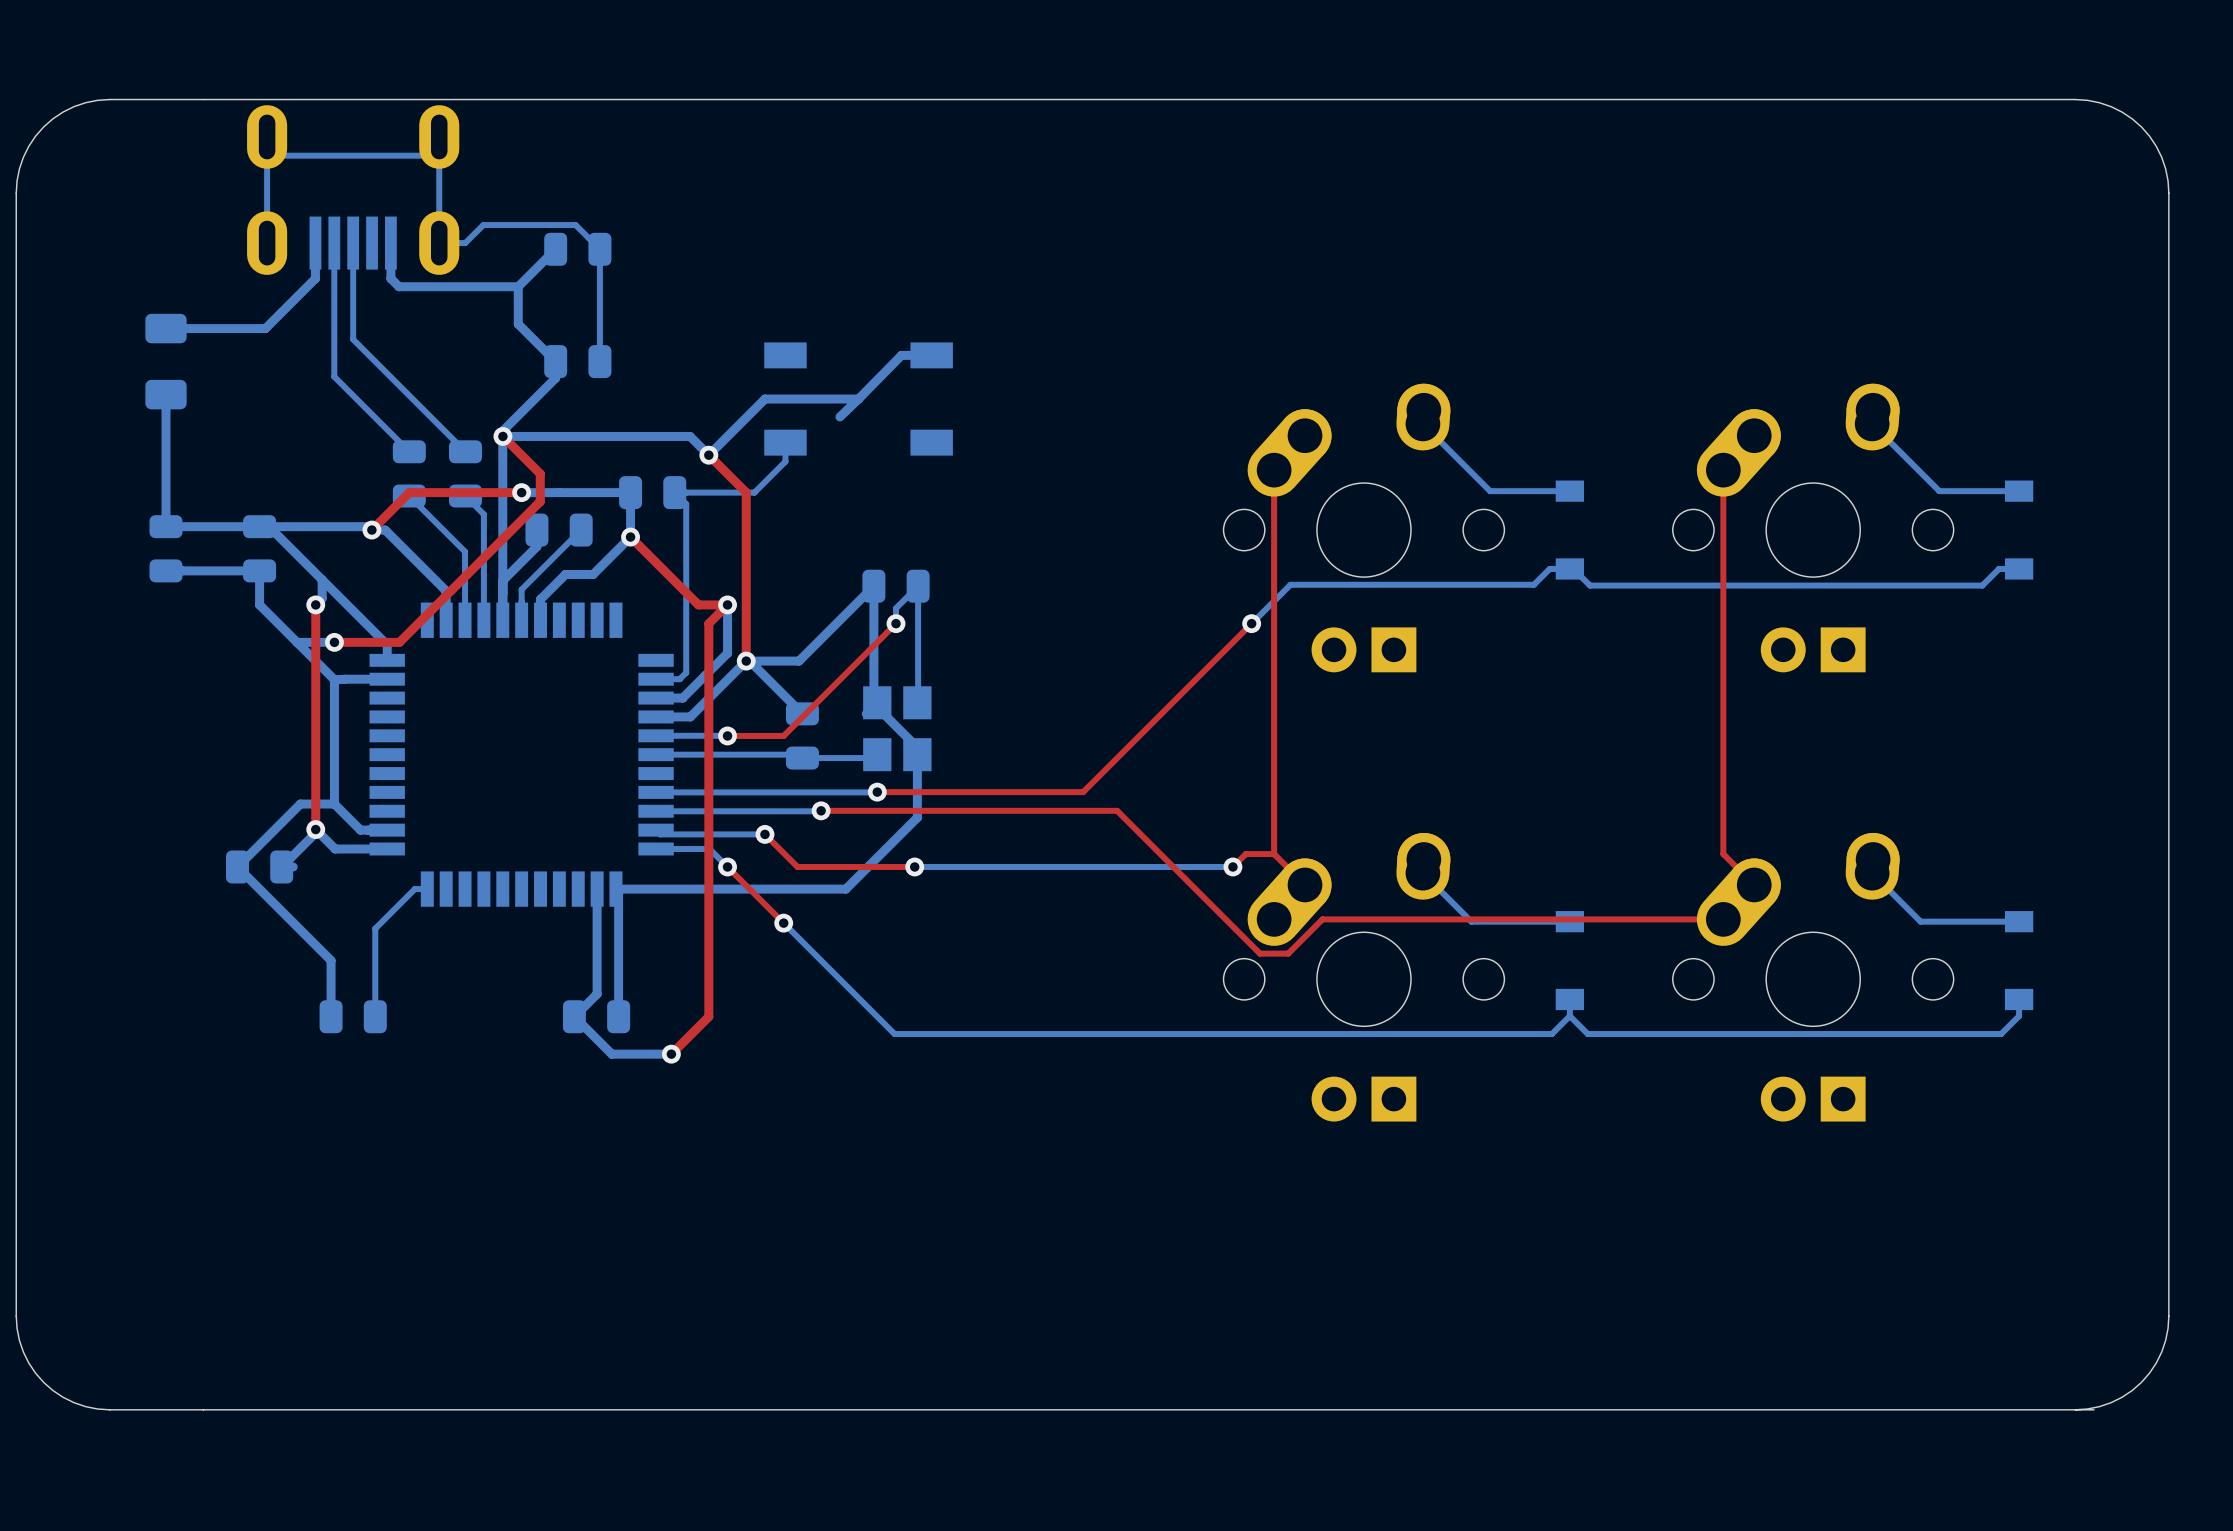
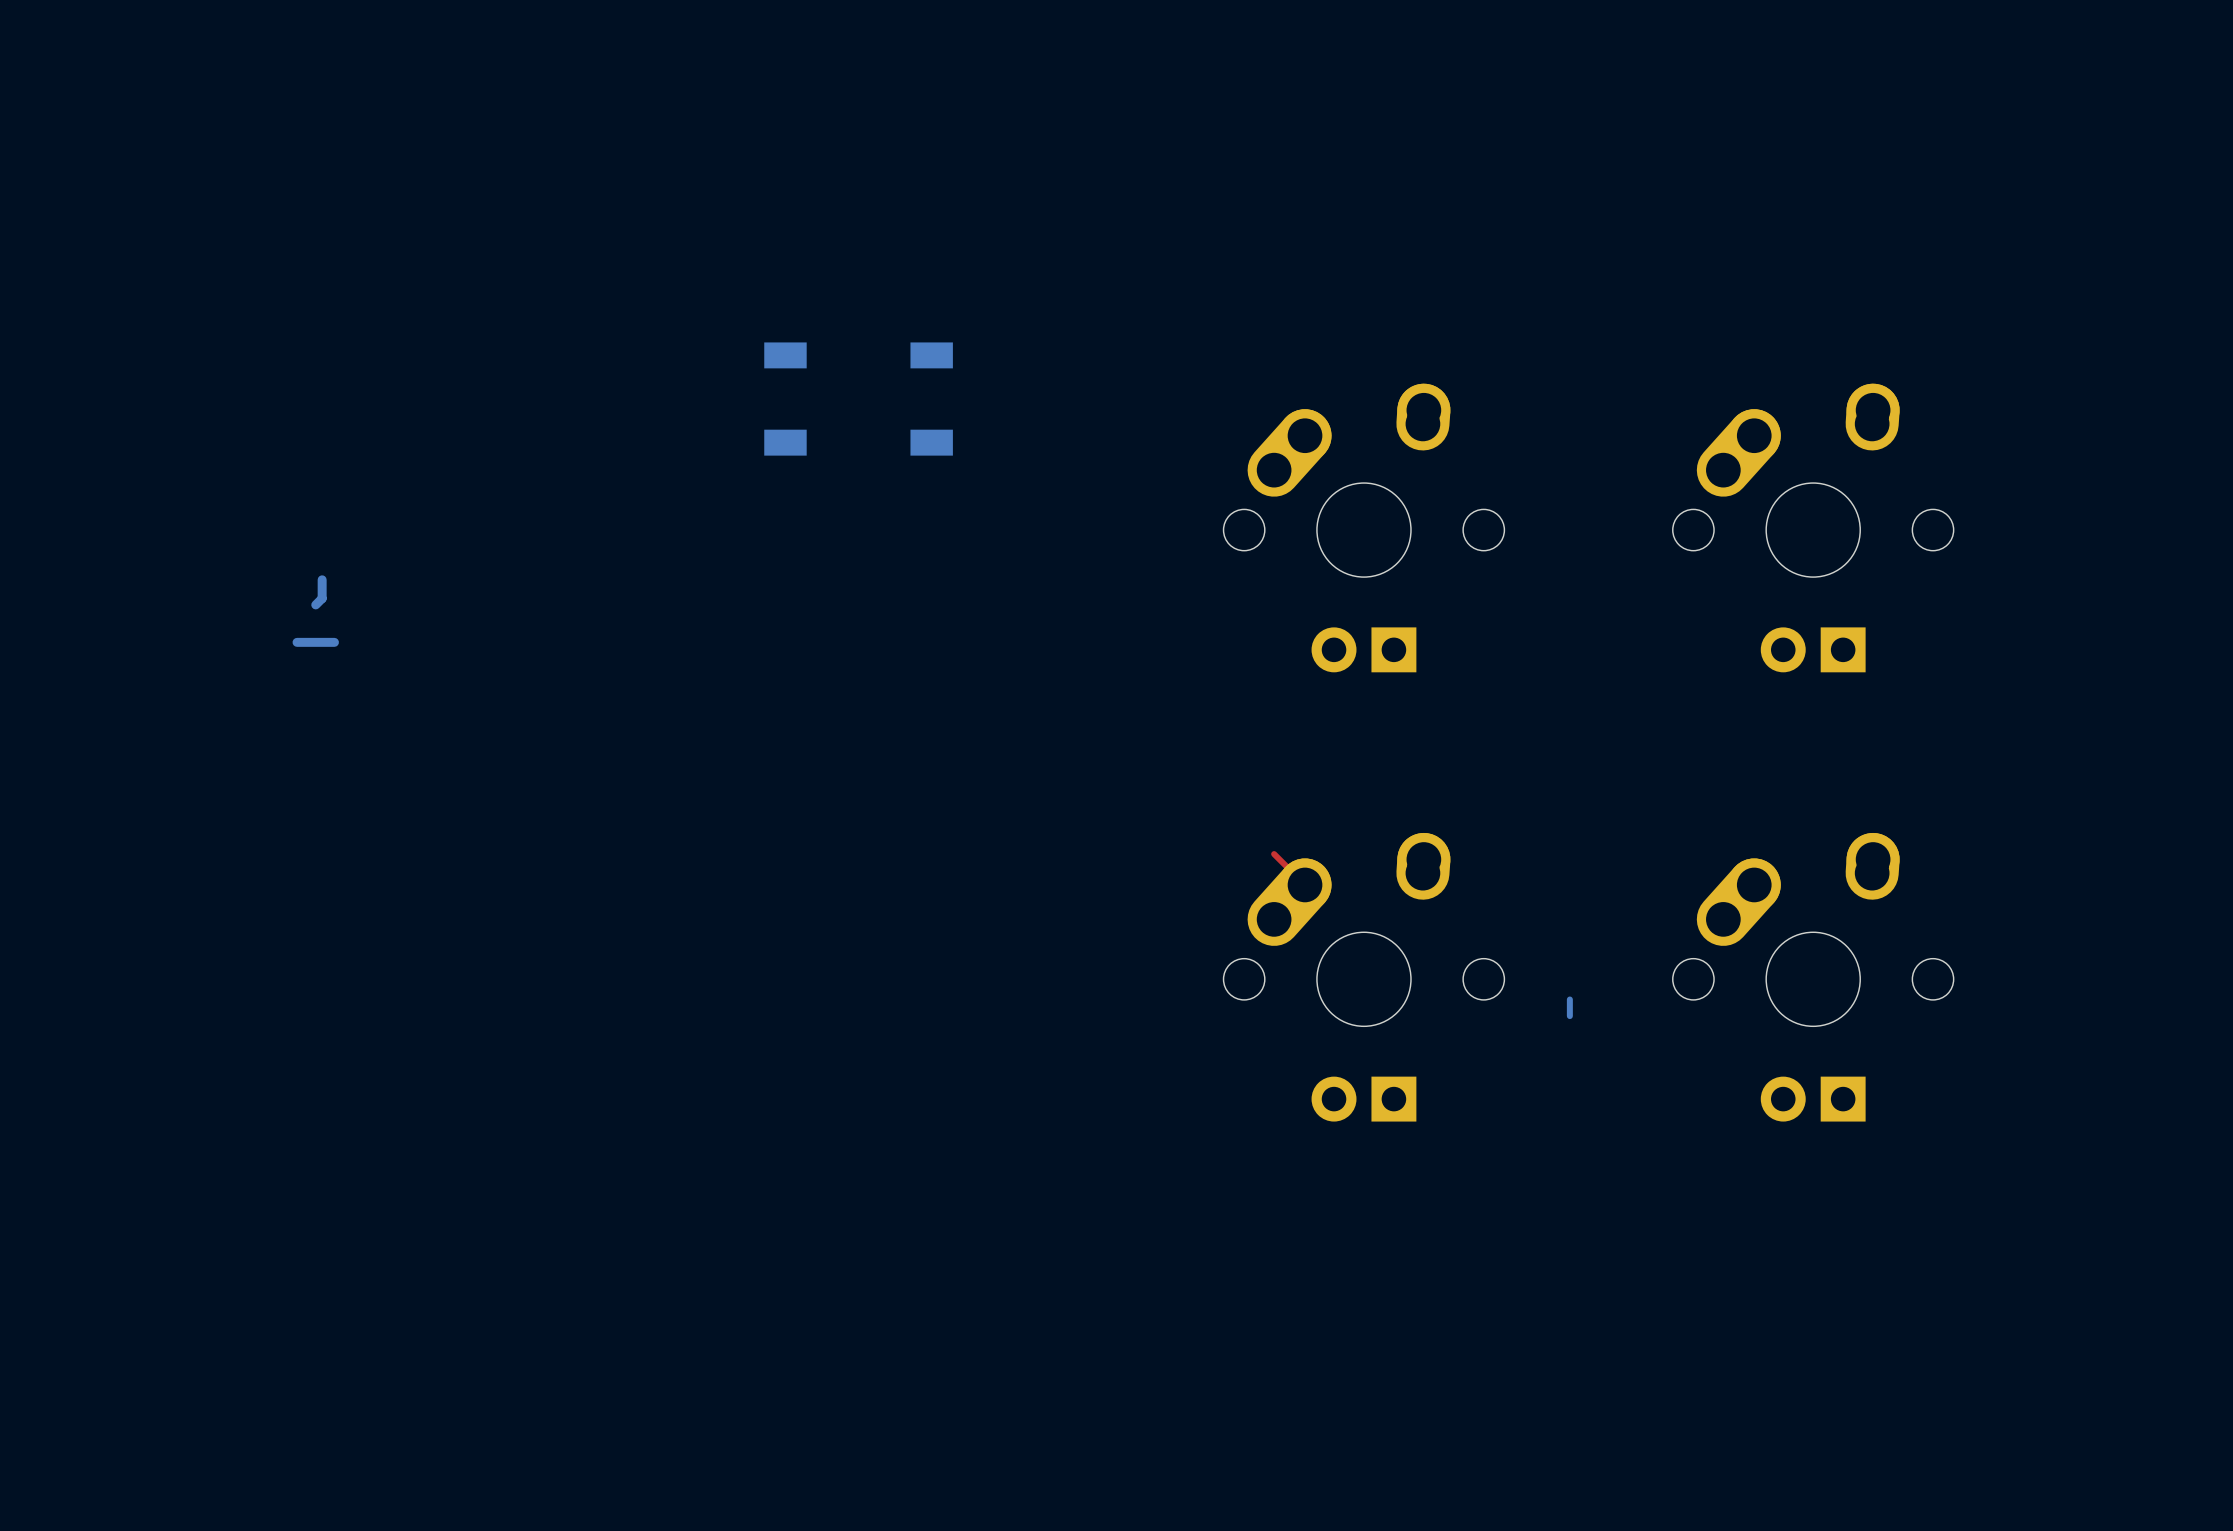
part: (353, 190) -> none
bottom track: (315, 243) (315, 278) (265, 328) (166, 328) -> none
bottom track: (334, 243) (334, 376) (409, 451) -> none
bottom track: (353, 243) (353, 339) (465, 451) -> none
bottom track: (390, 243) (390, 278) (399, 286) (518, 286) -> none
bottom track: (439, 243) (465, 243) (483, 225) (575, 225) (599, 249) (599, 361) -> none
bottom track: (555, 249) (518, 286) -> none
part: (577, 249) -> none
bottom track: (267, 261) (267, 155) (439, 155) (439, 261) -> none
bottom track: (518, 286) (518, 324) (555, 361) (555, 378) (502, 431) (502, 620) -> none
bottom track: (931, 355) (901, 355) (858, 399) -> none
part: (166, 361) -> none
part: (577, 361) -> none
bottom track: (166, 394) (166, 526) -> none
bottom track: (858, 399) (764, 399) (708, 455) (690, 436) (502, 436) -> none
bottom track: (858, 399) (839, 416) -> none
bottom track: (1422, 423) (1490, 491) (1569, 491) -> none
bottom track: (1872, 423) (1939, 491) (2019, 491) -> none
top track: (502, 436) (540, 473) (540, 501) (399, 642) (334, 642) -> none
via: (502, 436) -> none
bottom track: (785, 442) (785, 461) (754, 492) (674, 492) (686, 504) (686, 672) (679, 679) (656, 679) -> none
top track: (708, 455) (746, 492) (746, 661) -> none
via: (708, 455) -> none
top track: (1274, 470) (1274, 854) (1245, 854) (1232, 866) -> none
top track: (1723, 470) (1723, 854) (1754, 884) -> none
part: (409, 473) -> none
part: (465, 473) -> none
bottom track: (521, 492) (630, 492) (630, 537) (593, 574) (565, 574) (540, 599) (540, 620) -> none
top track: (521, 492) (409, 492) (371, 530) -> none
via: (521, 492) -> none
part: (652, 492) -> none
bottom track: (409, 496) (465, 551) (465, 620) -> none
bottom track: (465, 496) (483, 514) (483, 620) -> none
bottom track: (182, 526) (368, 526) (371, 530) (385, 530) (446, 591) (446, 620) -> none
bottom track: (269, 526) (387, 644) (387, 660) -> none
via: (371, 530) -> none
bottom track: (536, 530) (536, 546) (502, 580) -> none
part: (559, 530) -> none
bottom track: (581, 530) (521, 589) (521, 620) -> none
part: (1569, 530) -> none
part: (2019, 530) -> none
top track: (630, 537) (698, 604) (727, 604) (708, 623) (708, 1016) (671, 1054) -> none
via: (630, 537) -> none
part: (166, 548) -> none
part: (259, 548) -> none
bottom track: (2019, 568) (1998, 568) (1982, 585) (1590, 585) (1573, 568) (1549, 568) (1533, 584) (1290, 584) (1251, 623) -> none
bottom track: (166, 570) (259, 570) (259, 604) (334, 679) -> none
part: (896, 586) -> none
top track: (315, 604) (315, 829) -> none
via: (315, 604) -> none
bottom track: (727, 604) (727, 653) (682, 698) (656, 698) -> none
via: (727, 604) -> none
bottom track: (896, 623) (896, 608) (918, 586) (917, 702) -> none
top track: (896, 623) (783, 735) (727, 735) -> none
via: (896, 623) -> none
top track: (1251, 623) (1083, 792) (877, 792) -> none
via: (1251, 623) -> none
via: (334, 642) -> none
via: (746, 661) -> none
bottom track: (749, 661) (802, 713) -> none
bottom track: (334, 679) (334, 804) -> none
bottom track: (387, 679) (334, 679) -> none
bottom track: (877, 702) (877, 707) (917, 747) (917, 817) (845, 889) (615, 889) (618, 891) (618, 1016) -> none
bottom track: (877, 702) (873, 699) (873, 586) (799, 661) (746, 661) (690, 716) (656, 716) -> none
part: (897, 728) -> none
bottom track: (656, 735) (727, 735) -> none
via: (727, 735) -> none
part: (802, 735) -> none
part: (521, 754) -> none
bottom track: (656, 754) (799, 754) (802, 758) -> none
bottom track: (877, 754) (873, 758) (802, 758) -> none
bottom track: (656, 792) (877, 792) -> none
via: (877, 792) -> none
bottom track: (334, 804) (360, 830) (387, 830) -> none
bottom track: (334, 804) (300, 804) (237, 866) (331, 960) (331, 1016) -> none
bottom track: (656, 810) (821, 810) -> none
top track: (821, 810) (1117, 810) (1259, 953) (1288, 953) (1322, 919) (1723, 919) -> none
via: (821, 810) -> none
via: (315, 829) -> none
bottom track: (656, 830) (660, 834) (764, 834) -> none
top track: (764, 834) (797, 866) (914, 866) -> none
via: (764, 834) -> none
bottom track: (387, 849) (335, 849) (315, 829) (315, 832) (281, 866) (293, 866) -> none
bottom track: (656, 849) (709, 849) (727, 866) -> none
part: (259, 866) -> none
top track: (727, 866) (783, 923) -> none
via: (727, 866) -> none
bottom track: (914, 866) (1232, 866) -> none
via: (914, 866) -> none
via: (1232, 866) -> none
bottom track: (1422, 873) (1471, 921) (1569, 921) -> none
bottom track: (1872, 873) (1920, 921) (2019, 921) -> none
bottom track: (427, 889) (414, 889) (375, 928) (375, 1016) -> none
bottom track: (597, 889) (597, 994) (574, 1016) (611, 1054) (671, 1054) -> none
bottom track: (783, 923) (894, 1034) (1551, 1034) (1569, 1016) (1587, 1034) (2001, 1034) (2019, 1016) (2019, 999) -> none
via: (783, 923) -> none
part: (1569, 960) -> none
part: (2019, 960) -> none
part: (353, 1016) -> none
part: (596, 1016) -> none
via: (671, 1054) -> none
board edge: (2075, 1409) (2087, 1409) (2099, 1406) (2111, 1402) (2122, 1397) (2141, 1382) (2149, 1373) (2161, 1352) (2168, 1328) (2168, 1316) (2168, 193) (2165, 168) (2156, 146) (2141, 126) (2122, 112) (2099, 102) (2075, 99) (109, 99) (85, 102) (63, 112) (43, 126) (28, 146) (19, 168) (16, 193) (16, 1316) (19, 1340) (28, 1363) (43, 1382) (63, 1397) (85, 1406) (109, 1409) (2093, 1409) -> none

